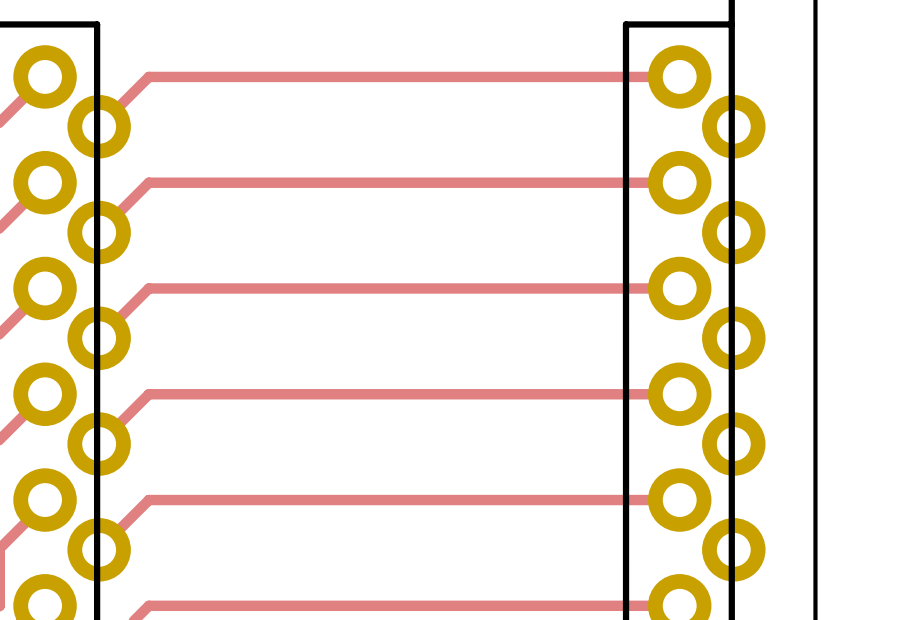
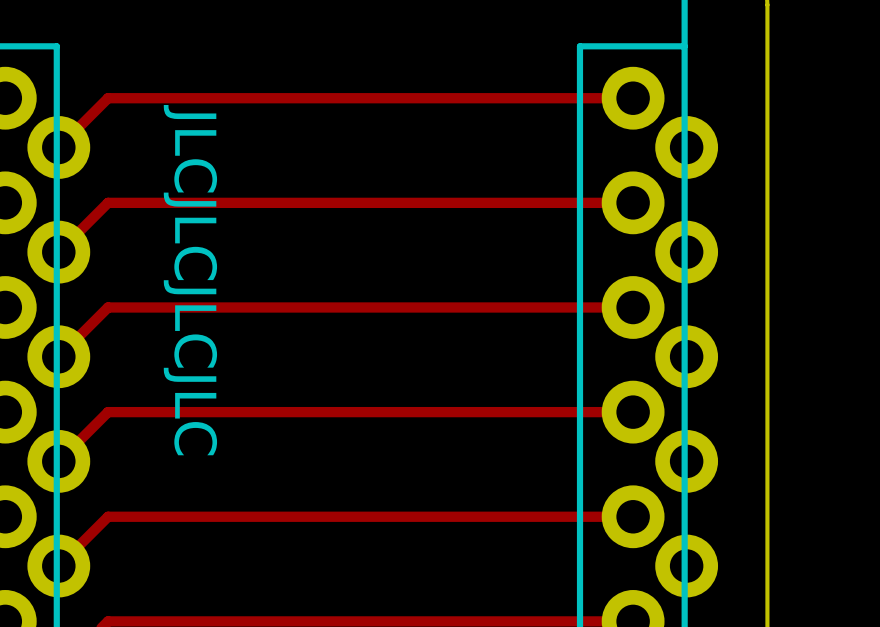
text: none -> JLCJLCJLCJLC (190, 280)

